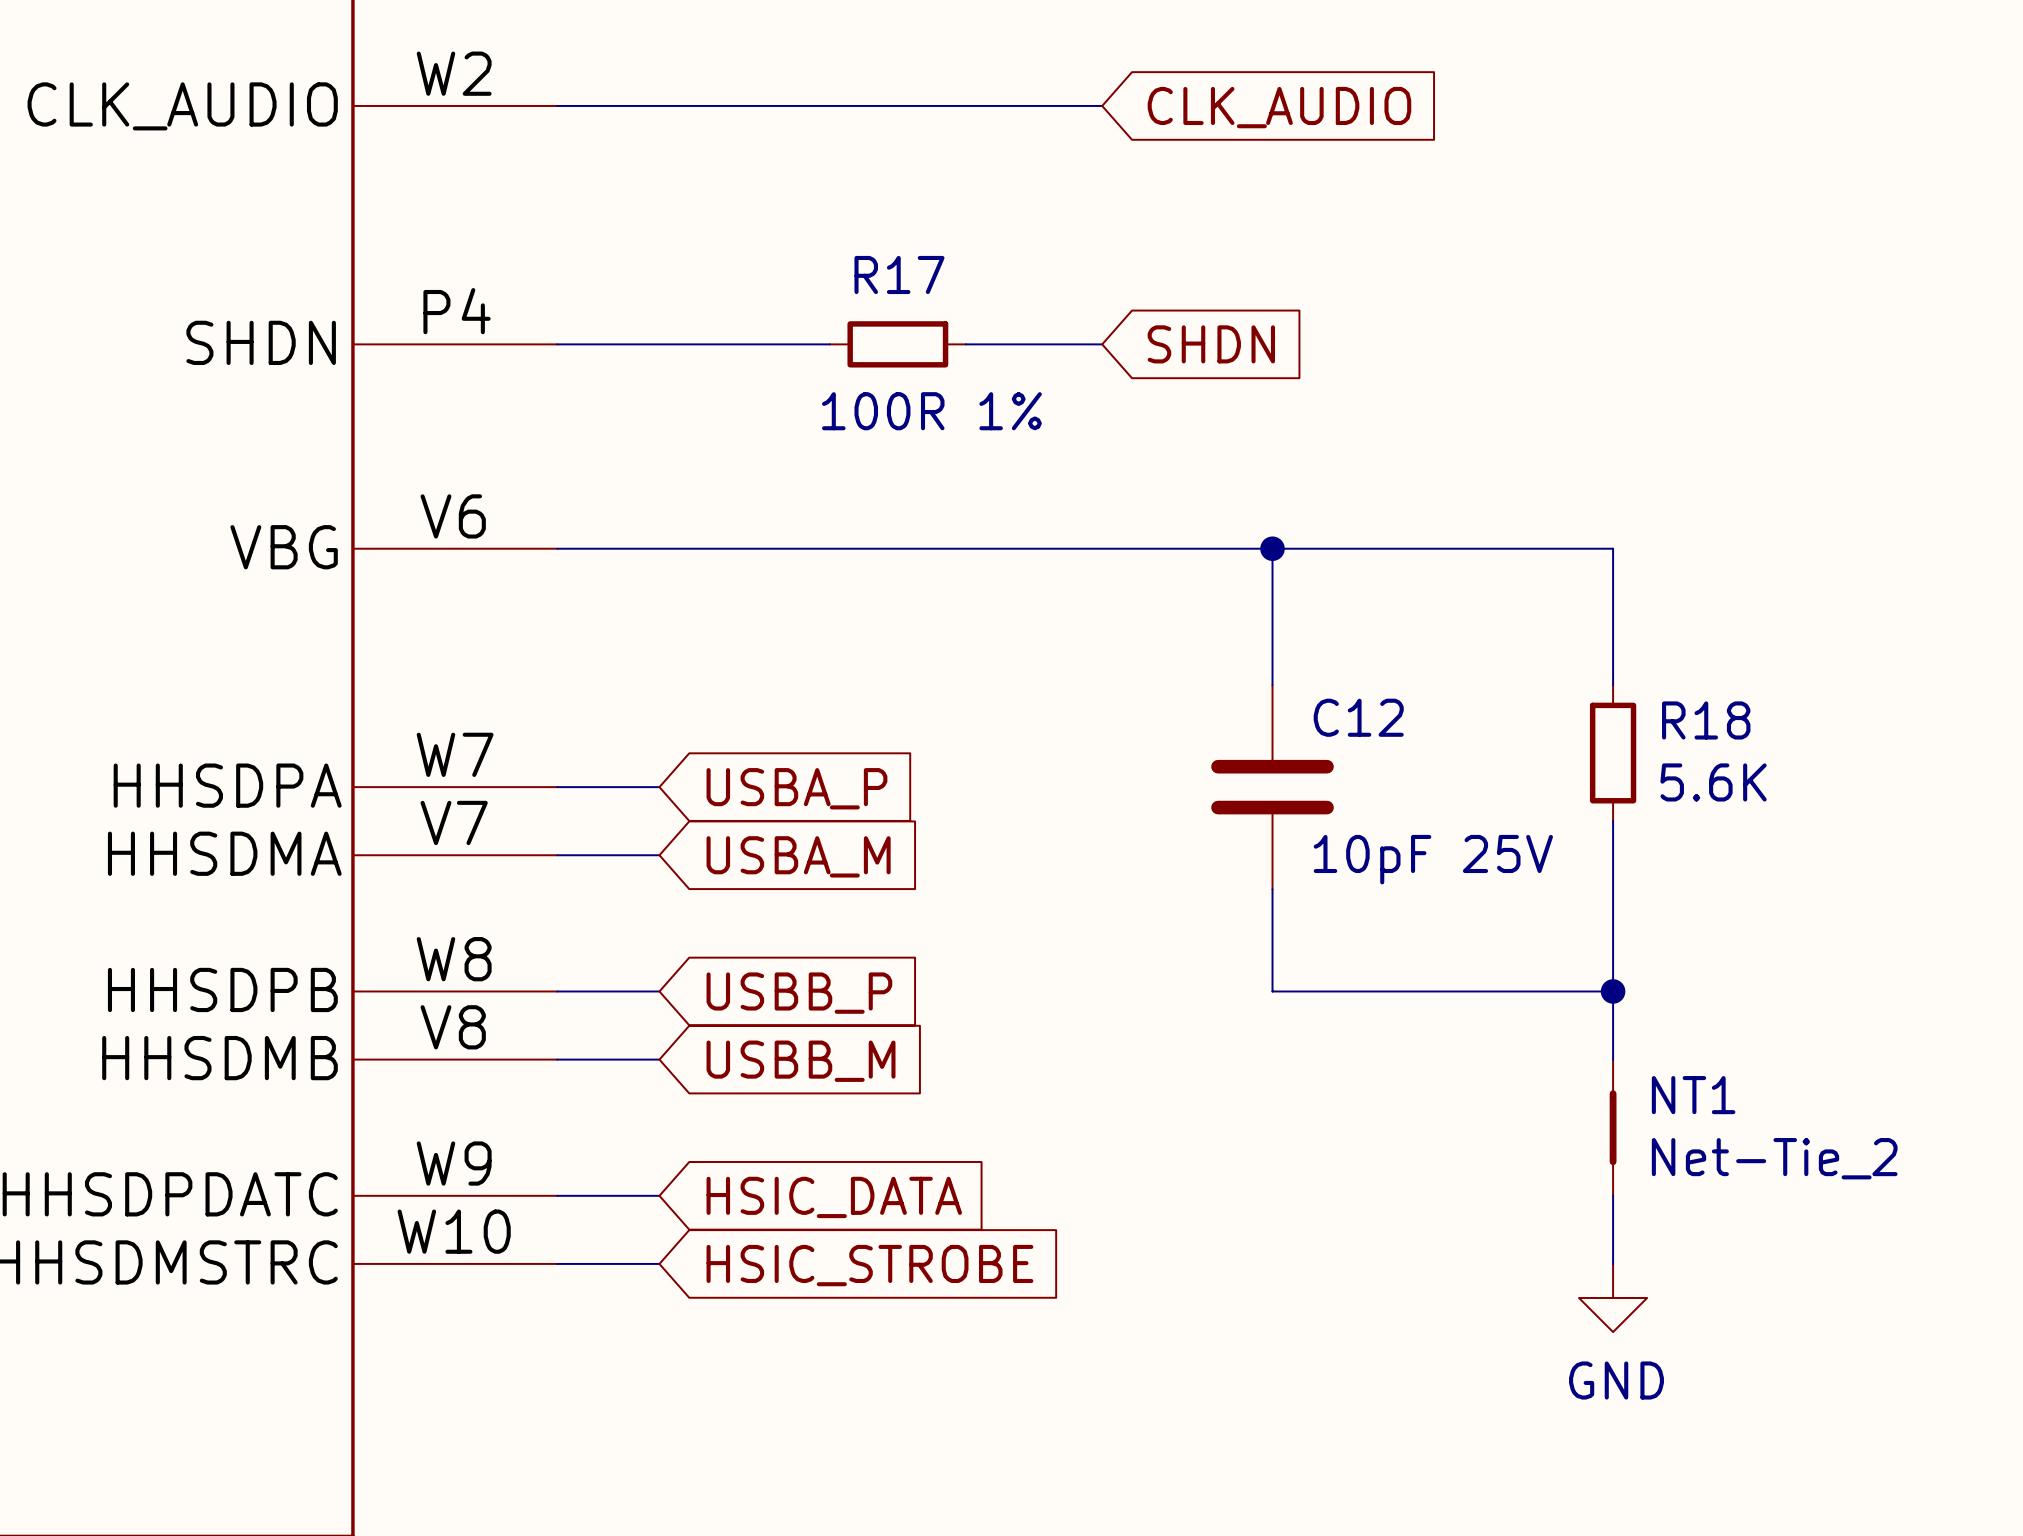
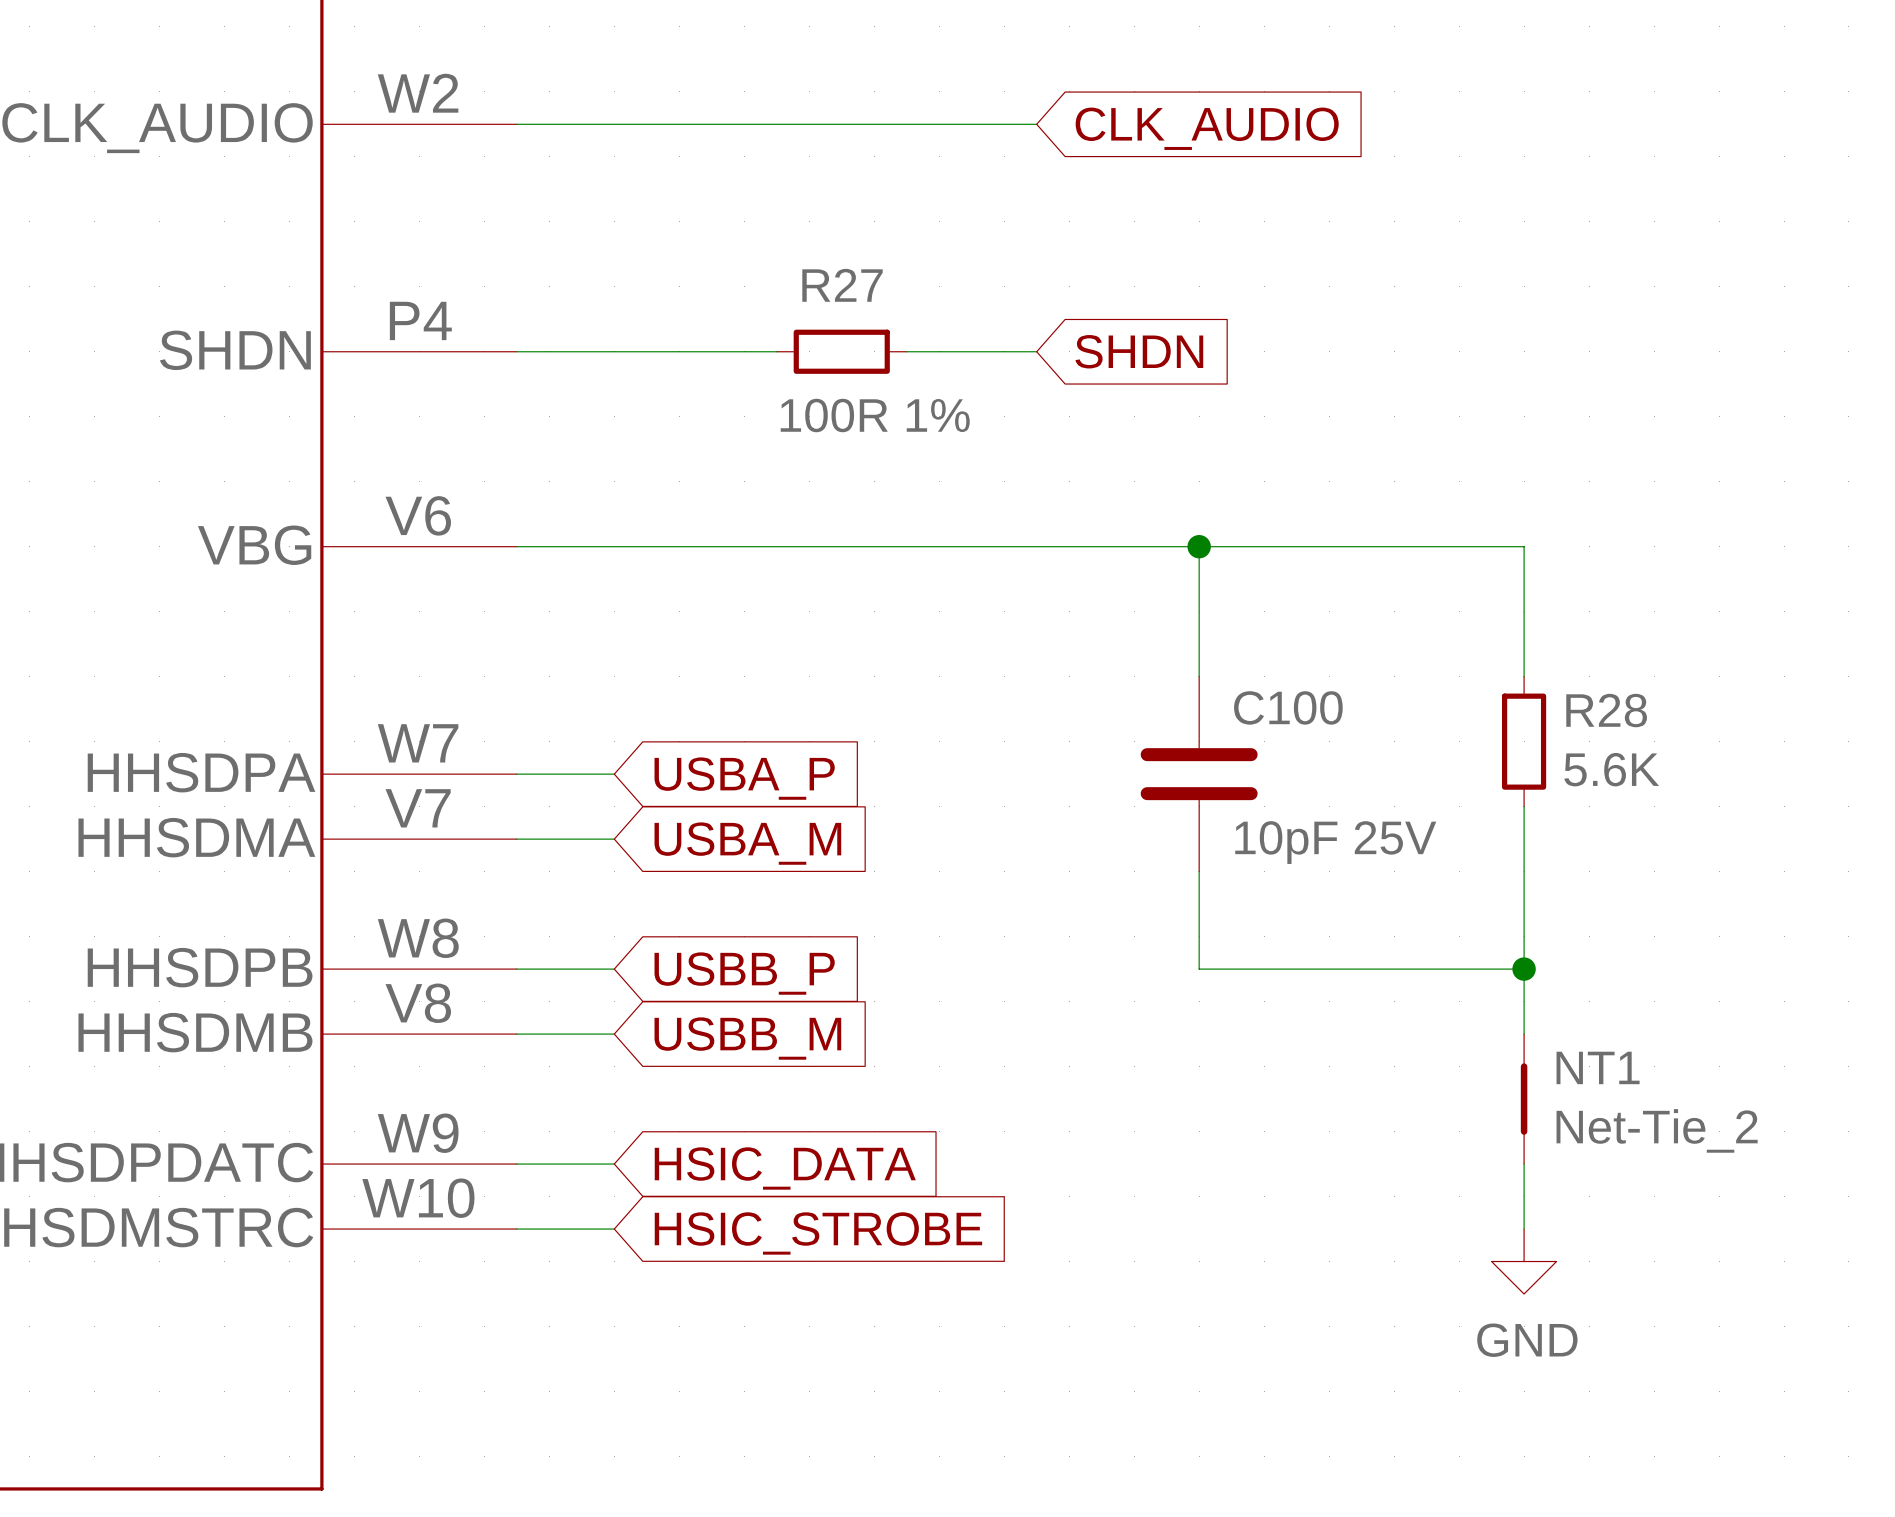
R17 name: R17 (899, 274) -> R27 (842, 285)
C12 name: C12 (1358, 717) -> C100 (1288, 707)
R18 name: R18 (1706, 720) -> R28 (1606, 710)

